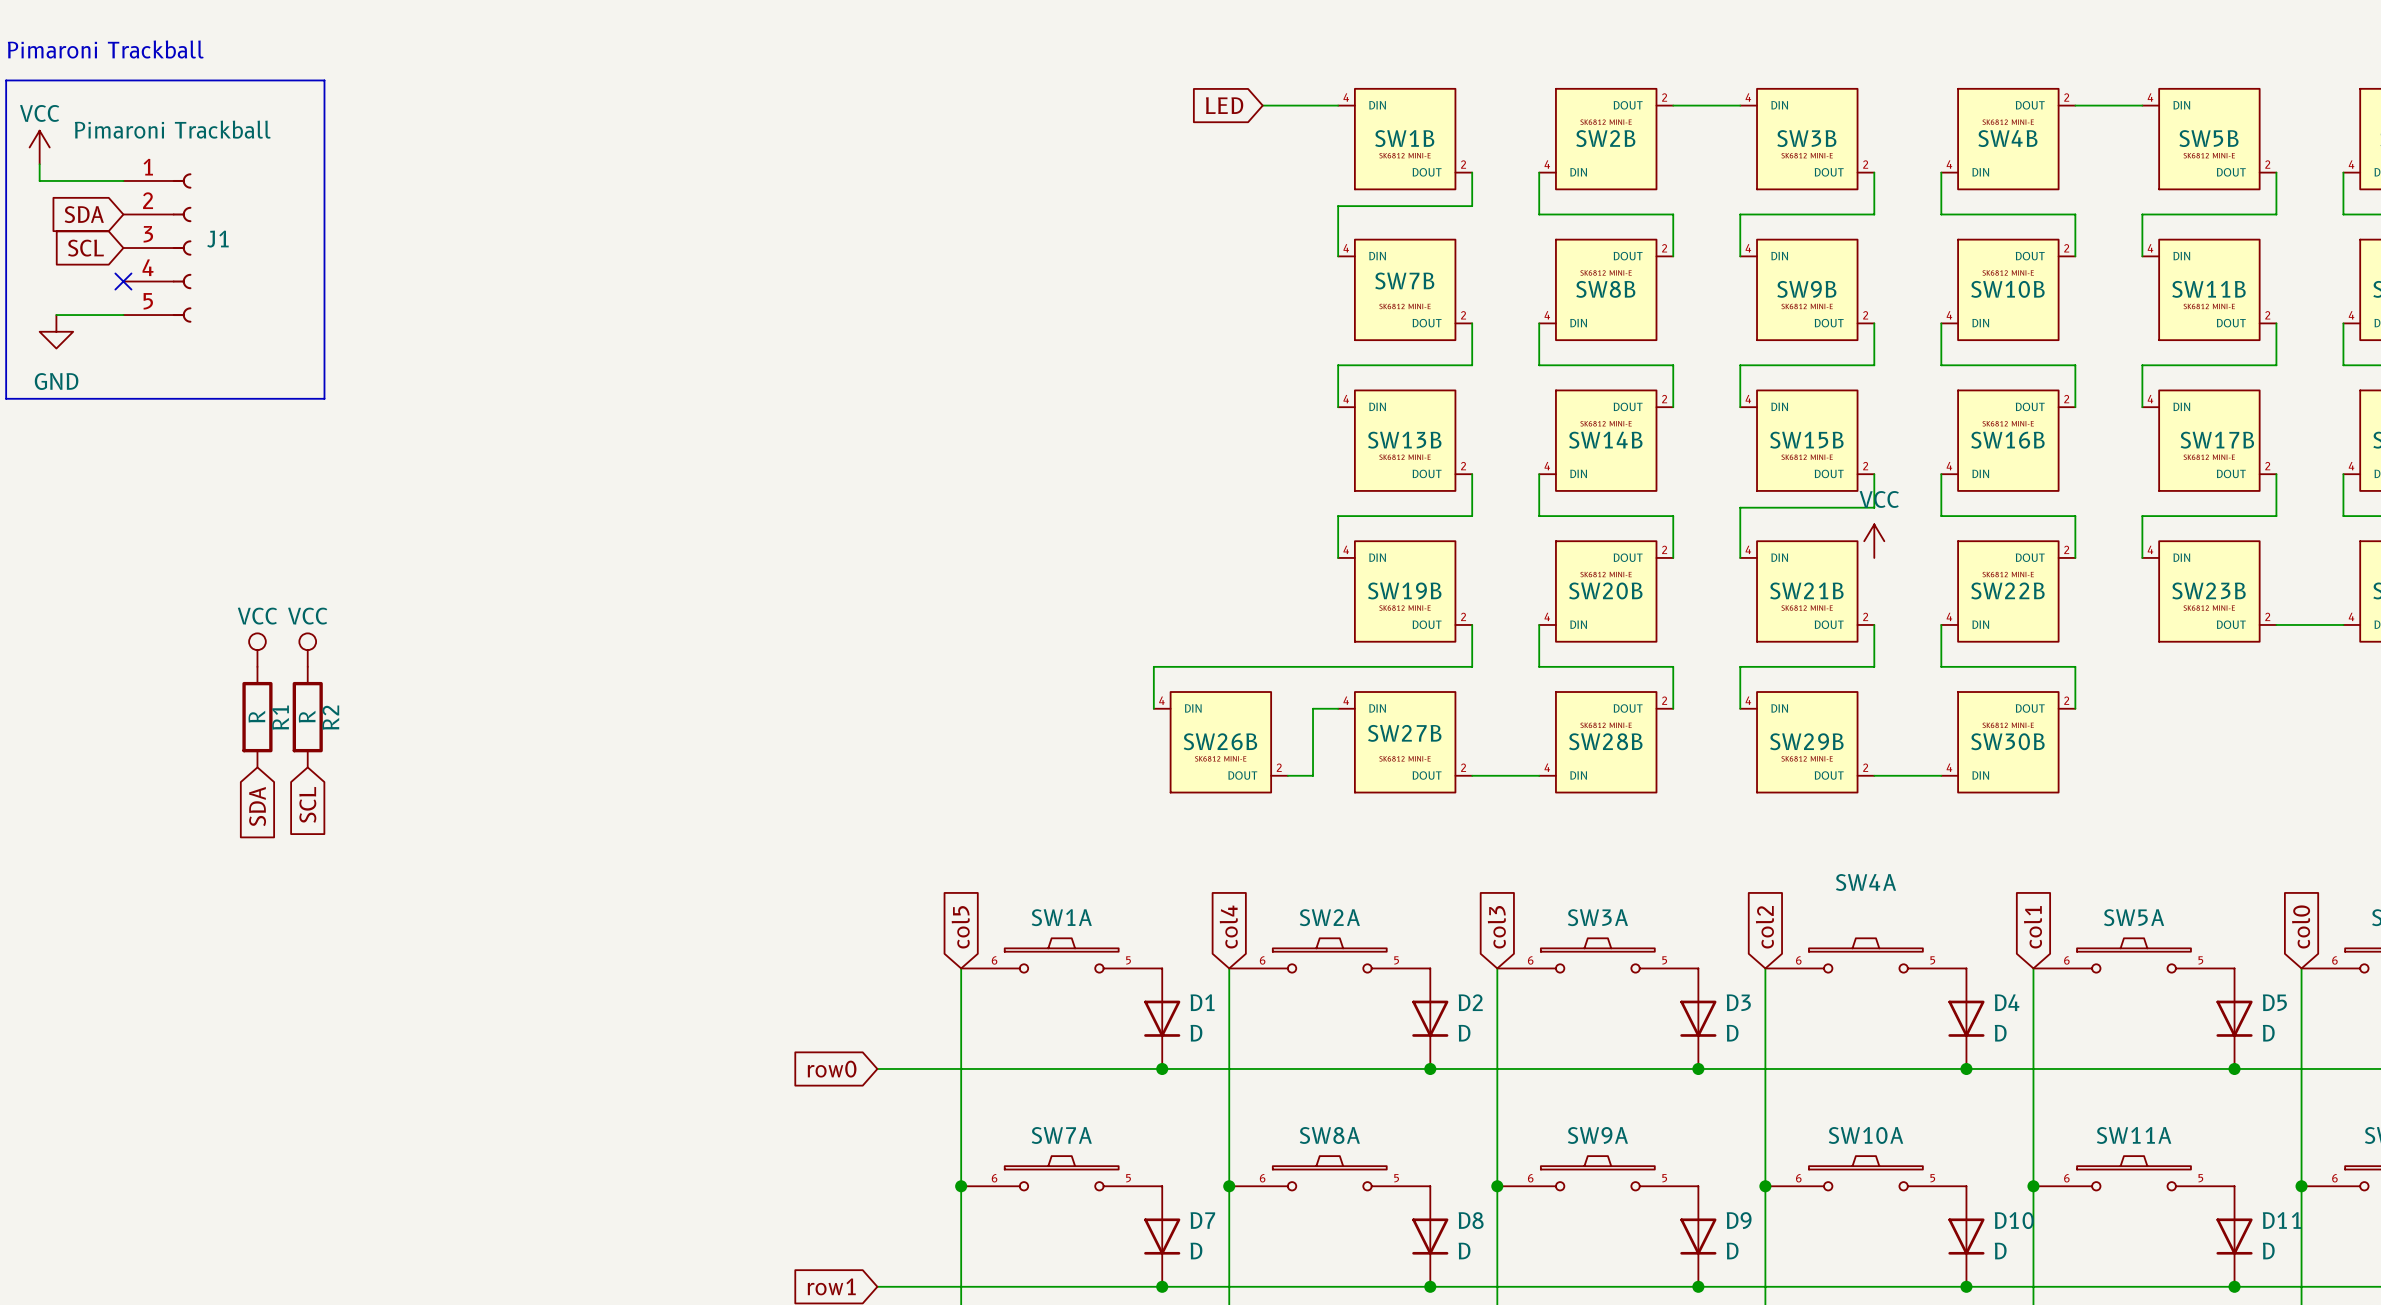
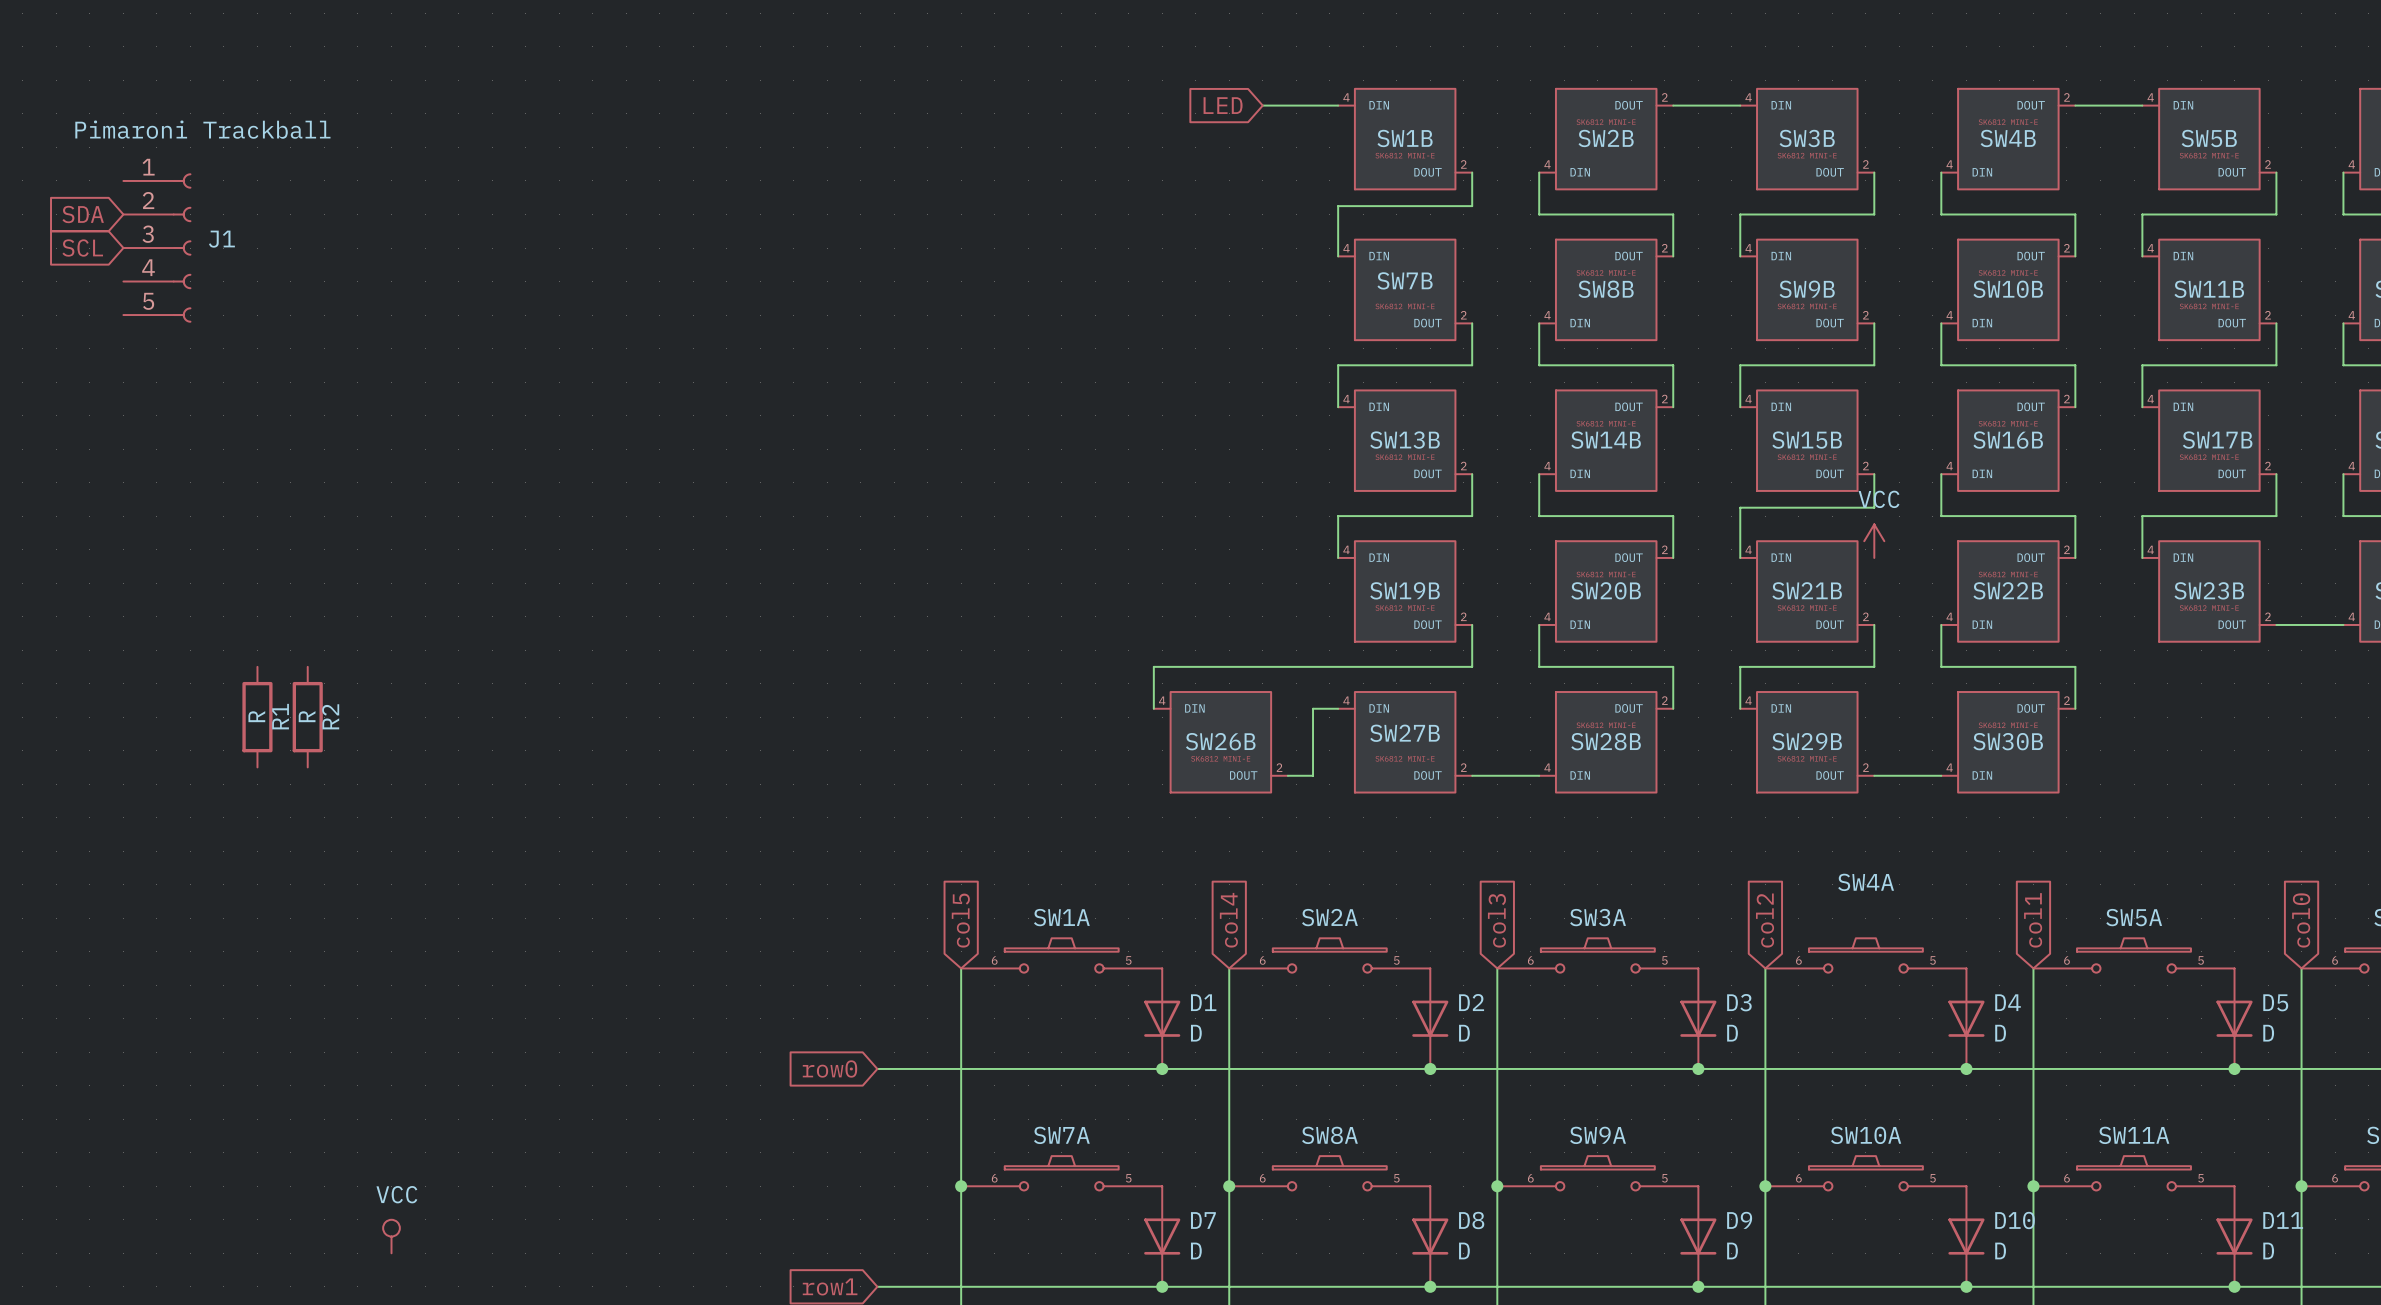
text: Pimaroni Trackball (105, 49) -> none
line: (6, 80) (324, 80) (324, 398) (6, 398) (6, 80) -> none
power symbol: VCC (39, 147) -> none
wire: (39, 164) (39, 180) (123, 180) -> none
no-connect mark: (123, 281) -> none
wire: (56, 315) (123, 315) -> none
power symbol: GND (56, 331) -> none
power symbol: VCC (257, 650) -> none
power symbol: VCC (307, 650) -> none
global label: SCL (307, 804) -> none
global label: SDA (257, 806) -> none
power symbol: none -> VCC (391, 1236)

